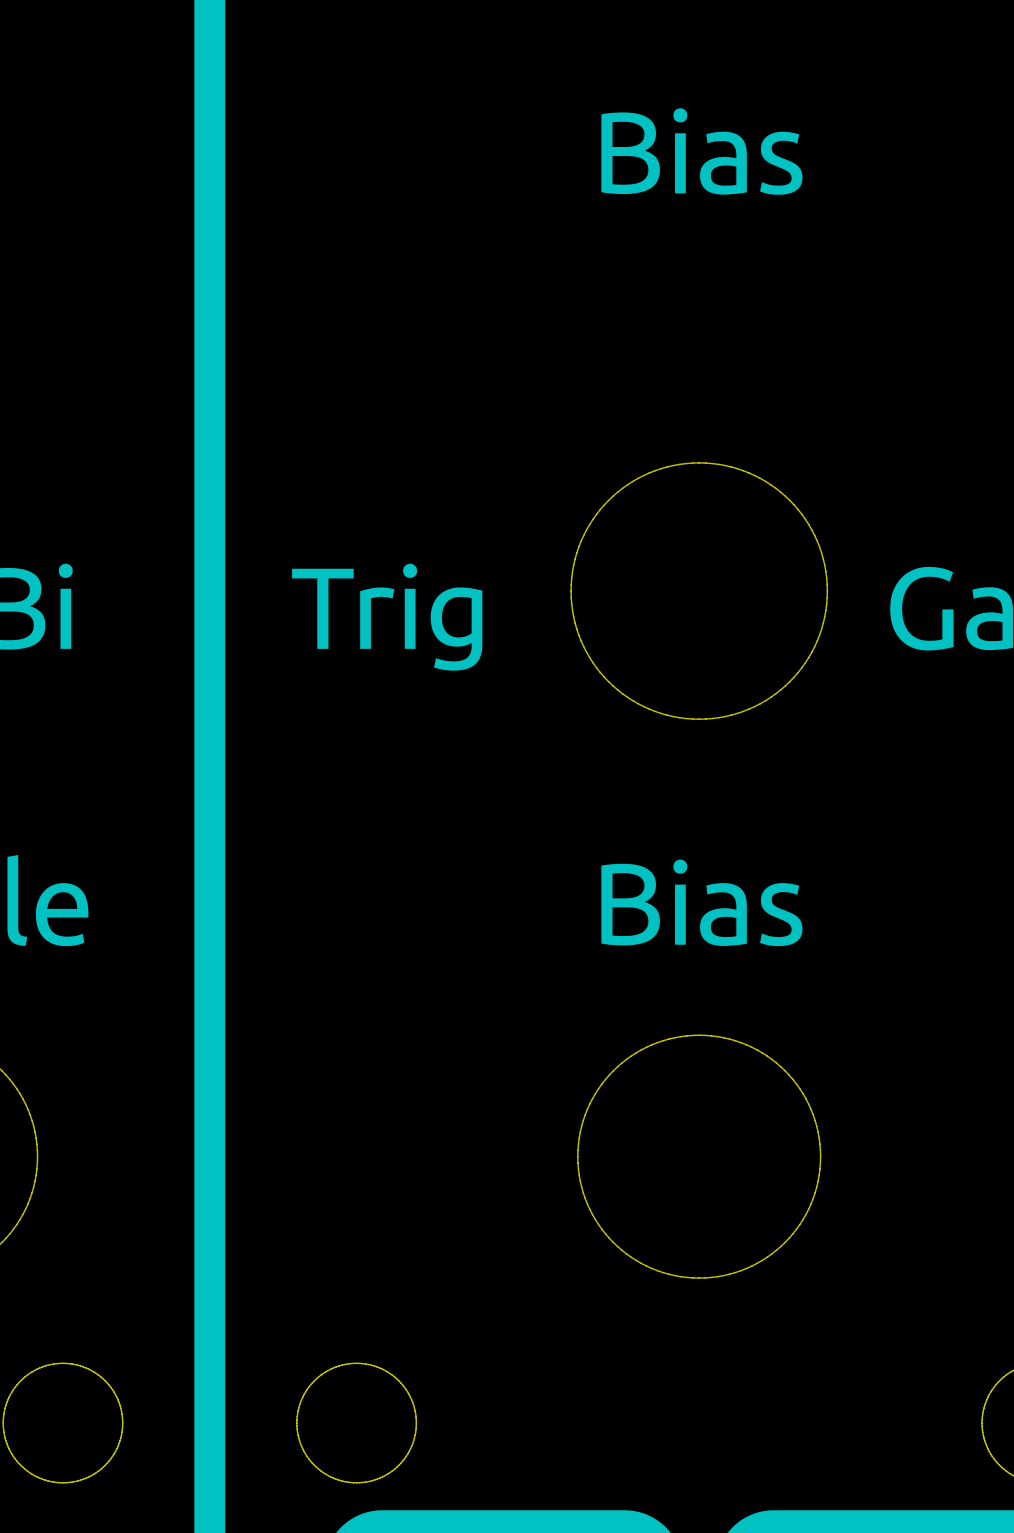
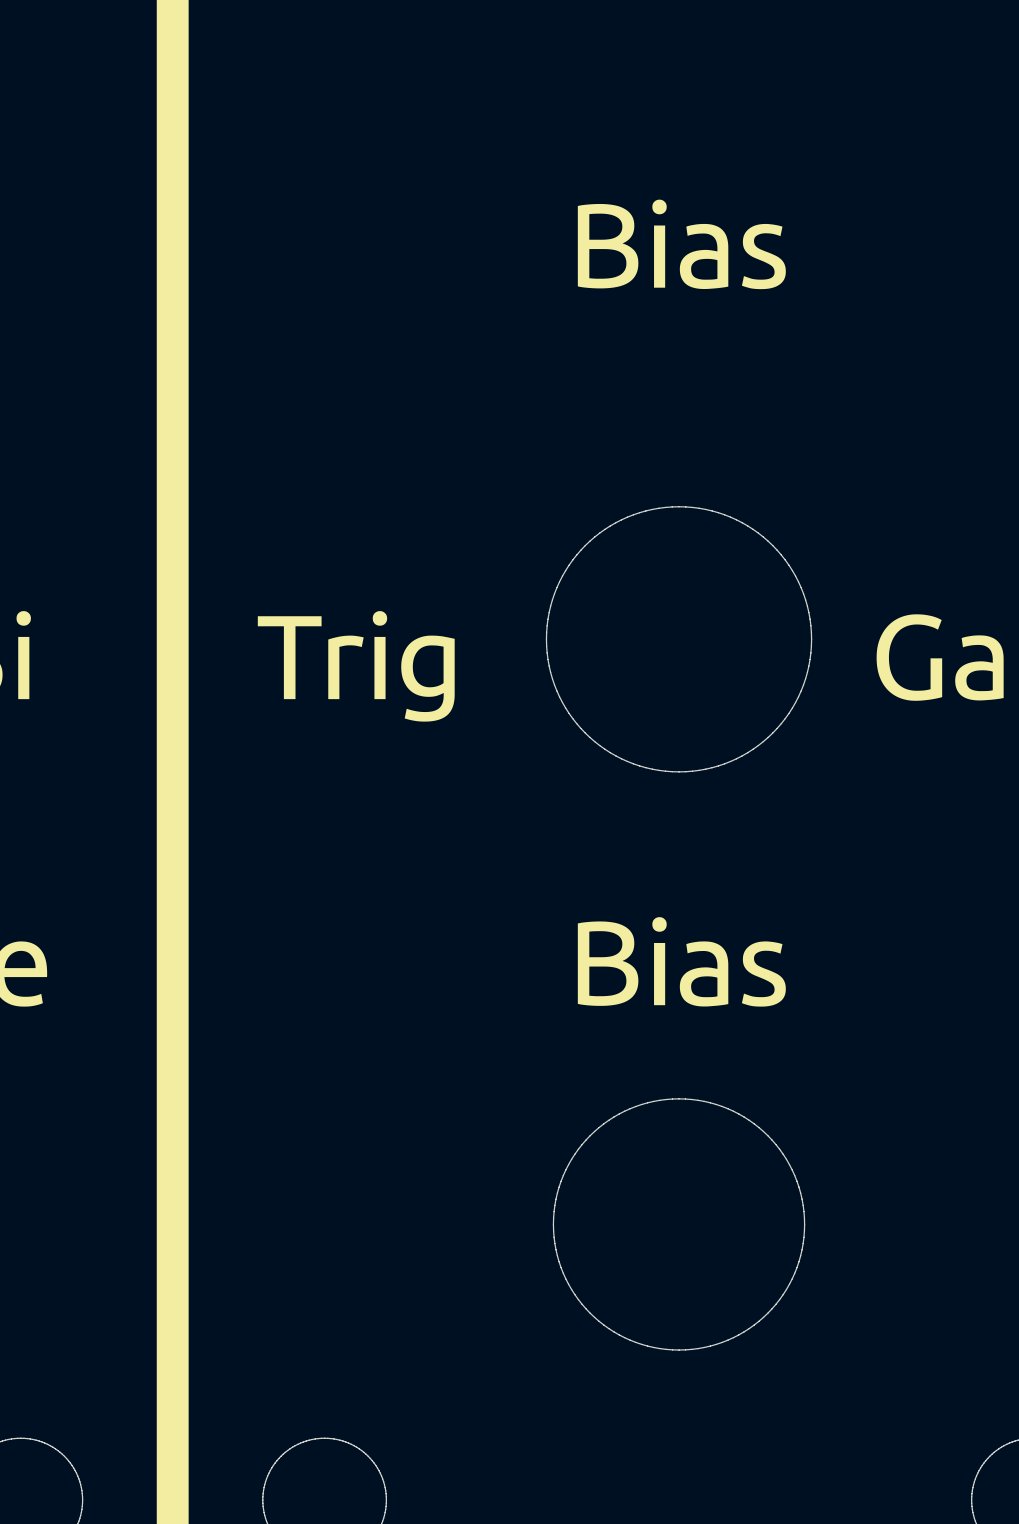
drawing position: (680, 115) -> (659, 206)
drawing position: (630, 153) -> (608, 246)
drawing position: (680, 163) -> (659, 256)
drawing position: (723, 163) -> (704, 256)
drawing position: (781, 163) -> (763, 256)

